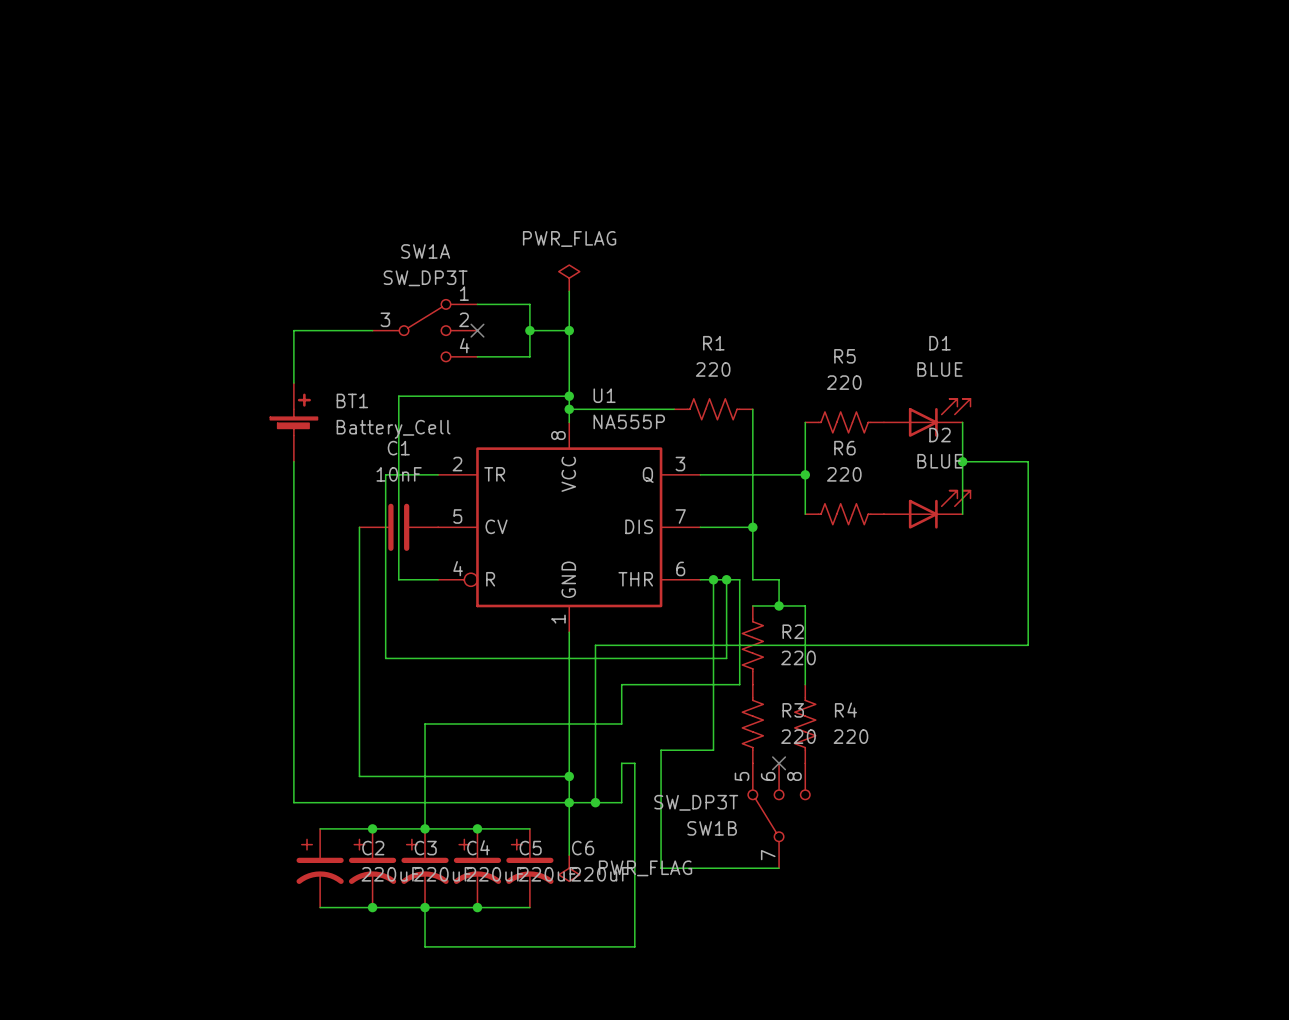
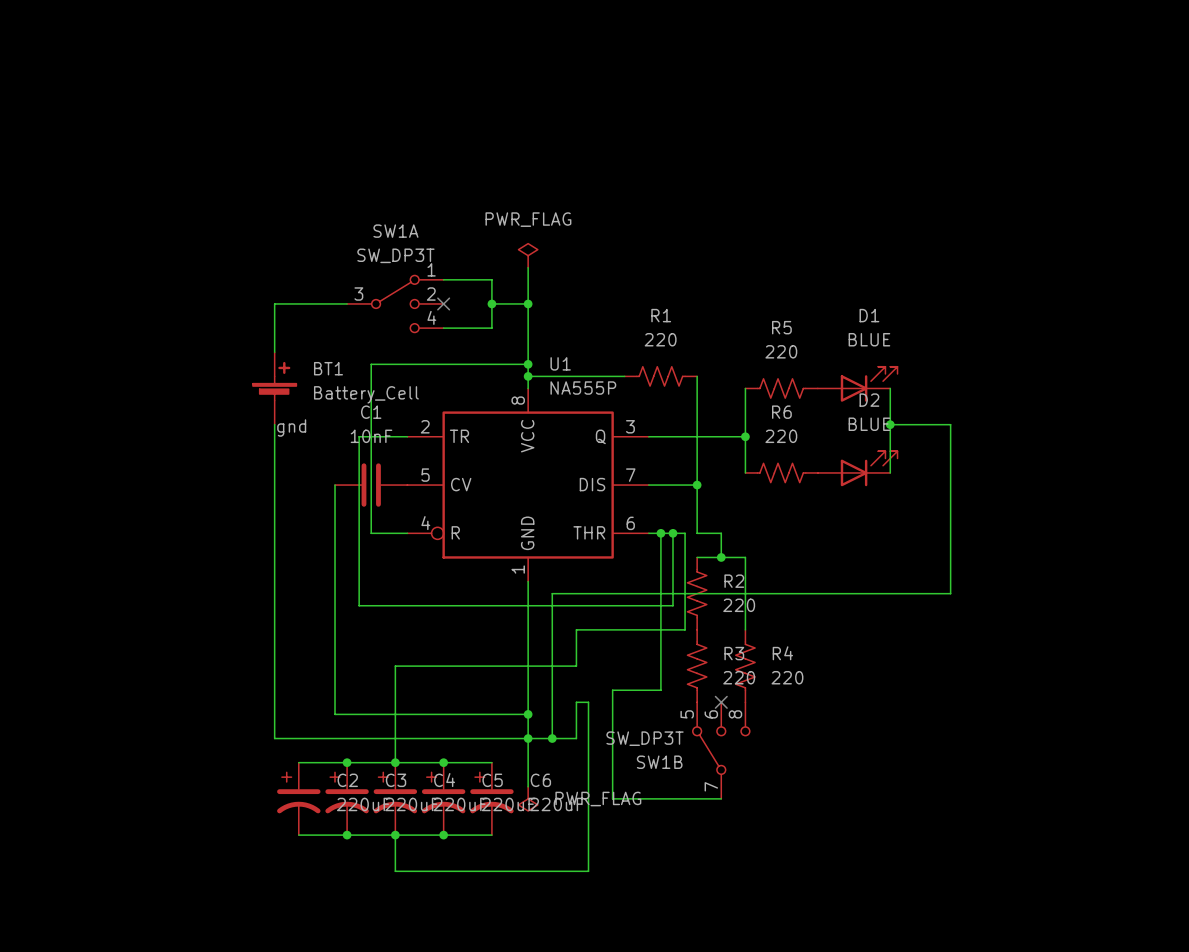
label: none -> gnd (291, 428)

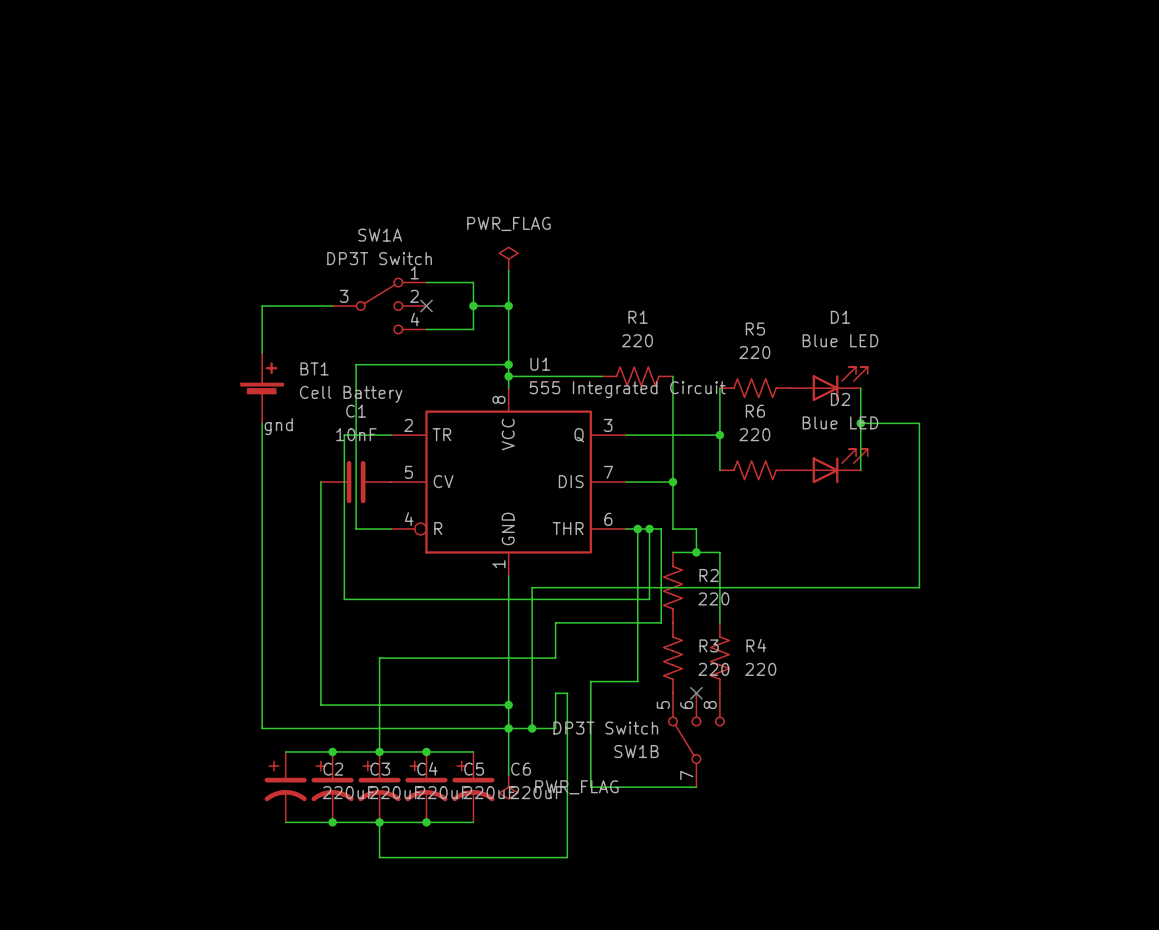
SW1A value: SW_DP3T (395, 255) -> DP3T Switch (379, 258)
D1 value: BLUE (869, 339) -> Blue LED (840, 340)
U1 value: NA555P (583, 388) -> 555 Integrated Circuit (627, 389)
BT1 value: Battery_Cell (366, 394) -> Cell Battery (351, 394)
D2 value: BLUE (869, 424) -> Blue LED (840, 422)
SW1B value: SW_DP3T (645, 738) -> DP3T Switch (605, 728)

